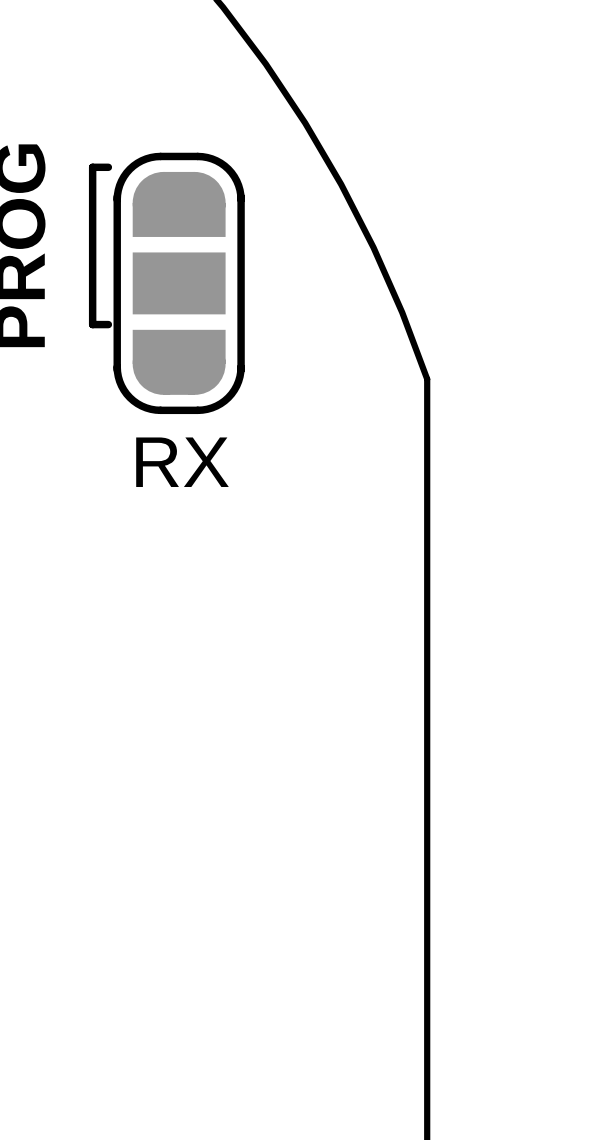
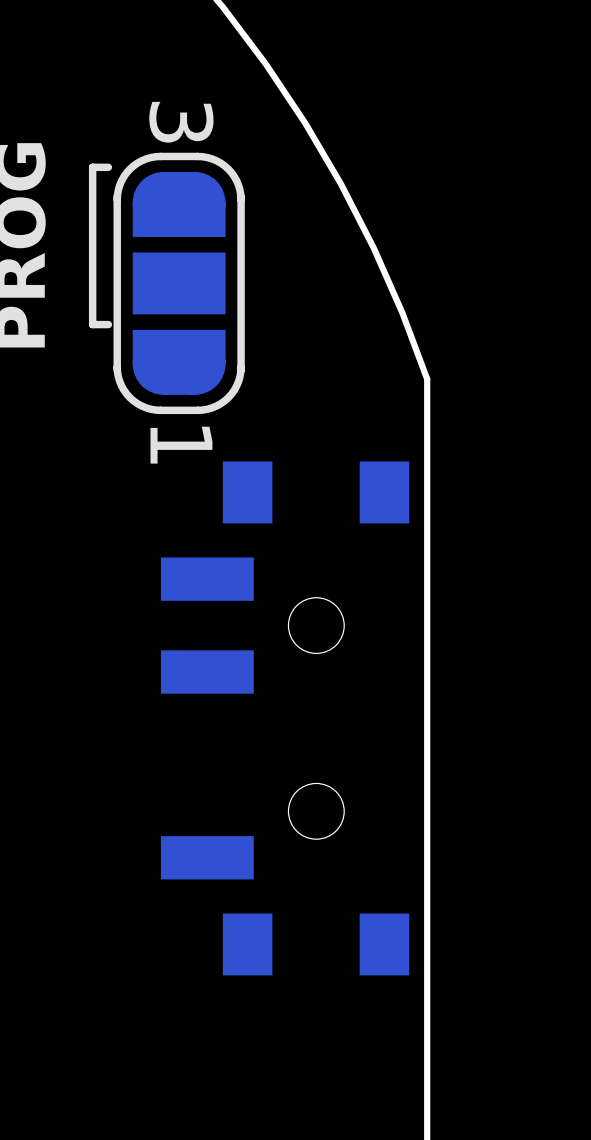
part text: none -> 3 (181, 122)
part text: none -> 1 (181, 445)
part value: RX (182, 462) -> none
part: none -> (285, 718)

